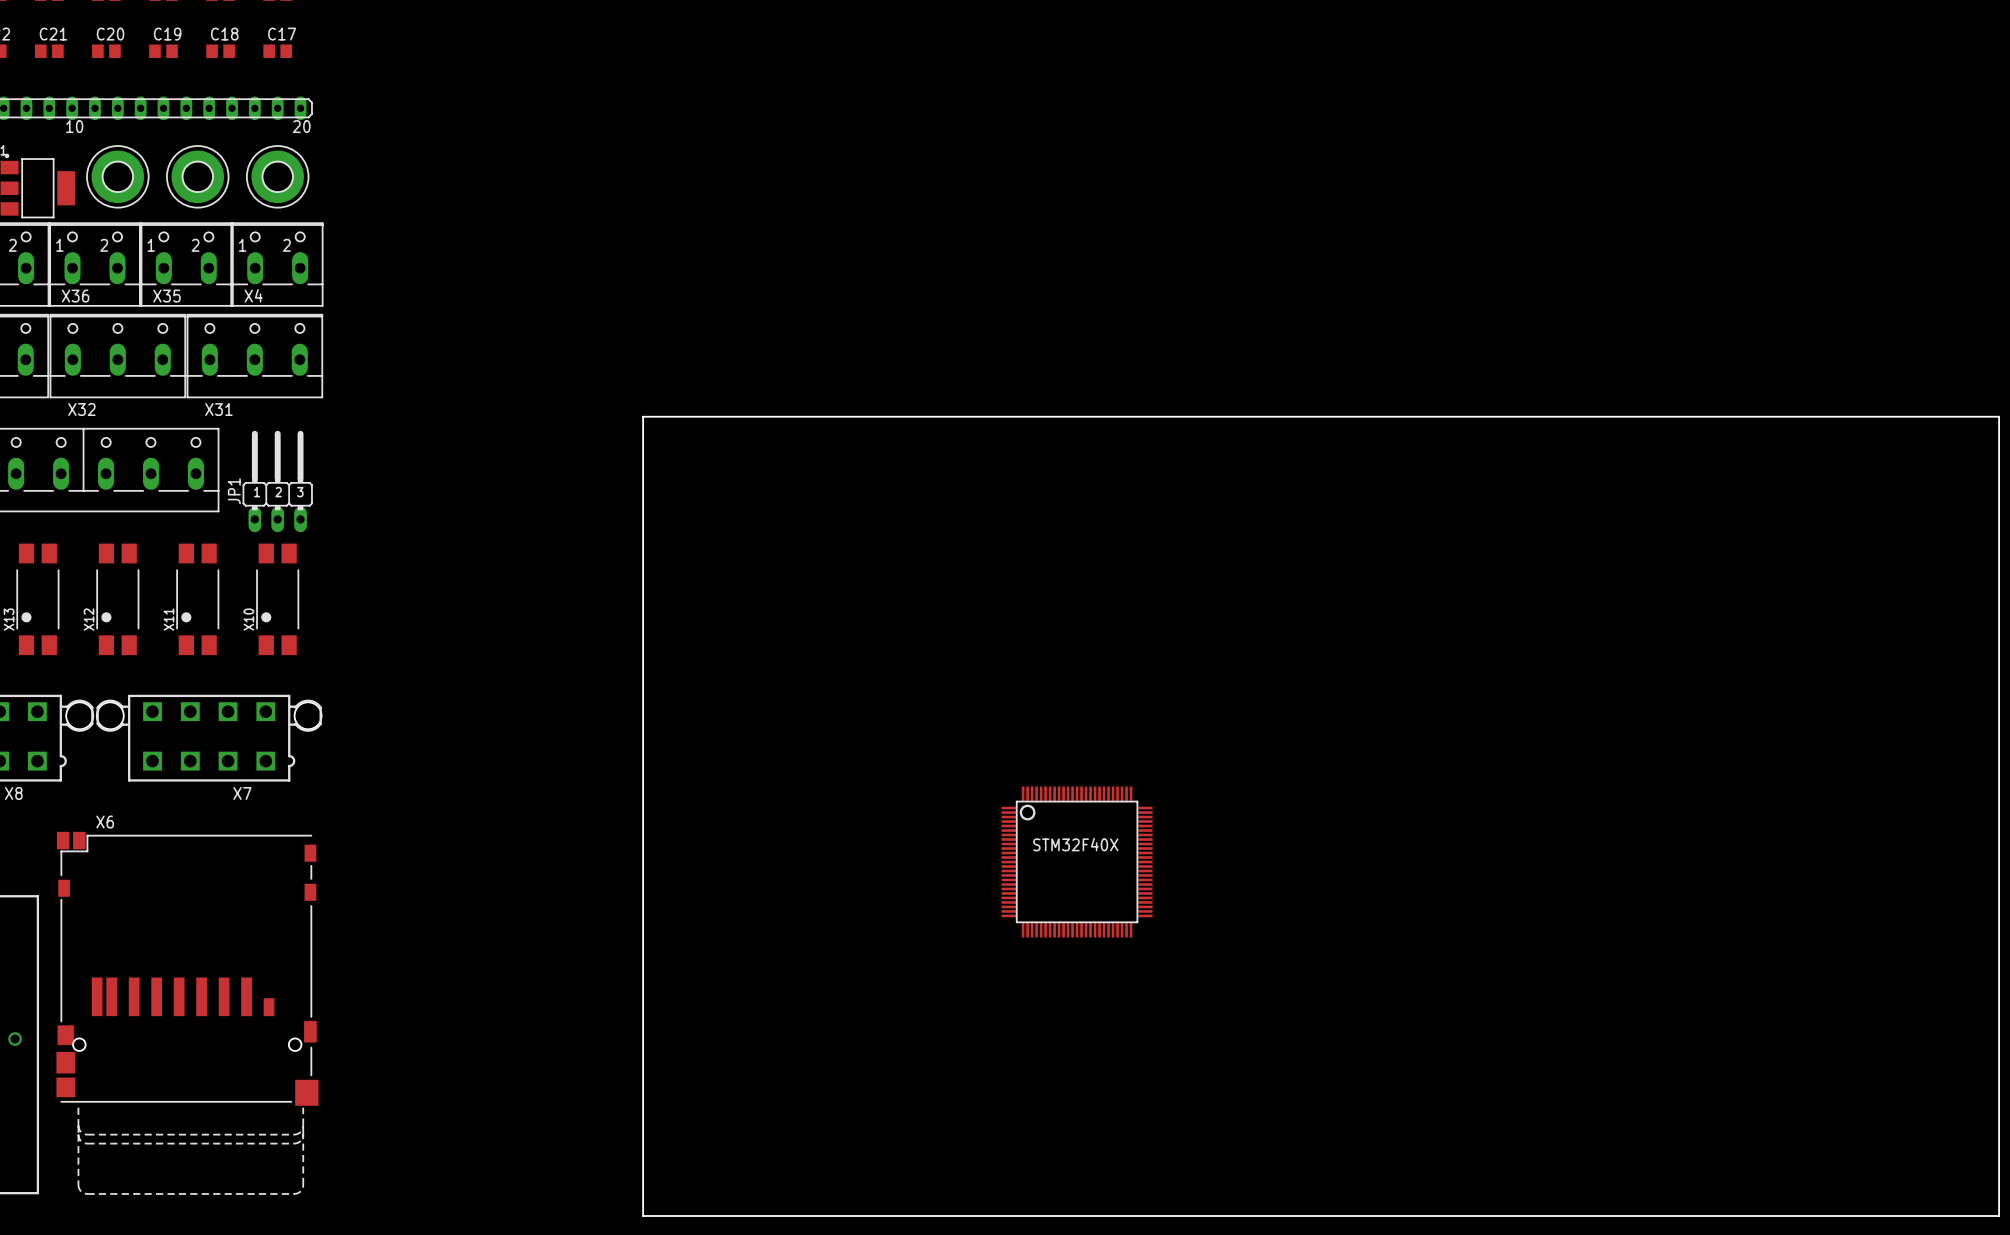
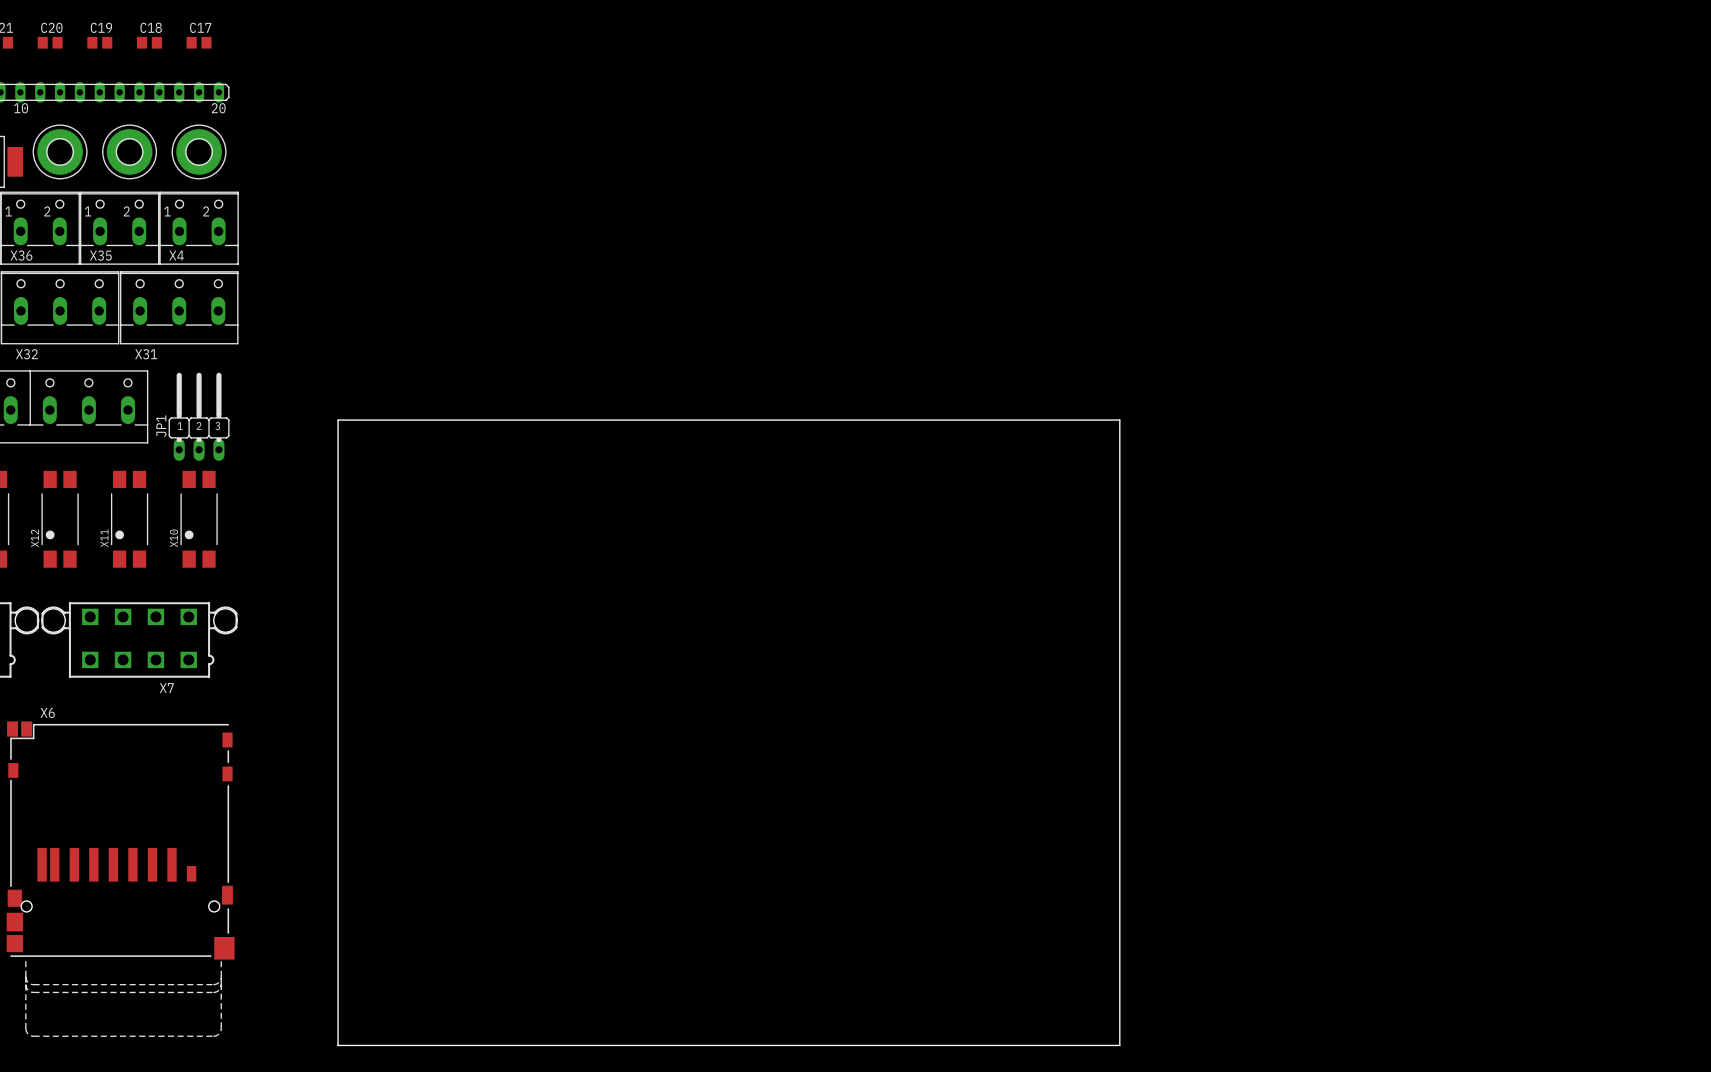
board edge: (643, 416) (1999, 416) (1999, 1216) (643, 1216) (643, 416) -> none
board edge: none -> (338, 420) (1119, 420) (1119, 1045) (338, 1045) (338, 420)
part: (1077, 861) -> none

